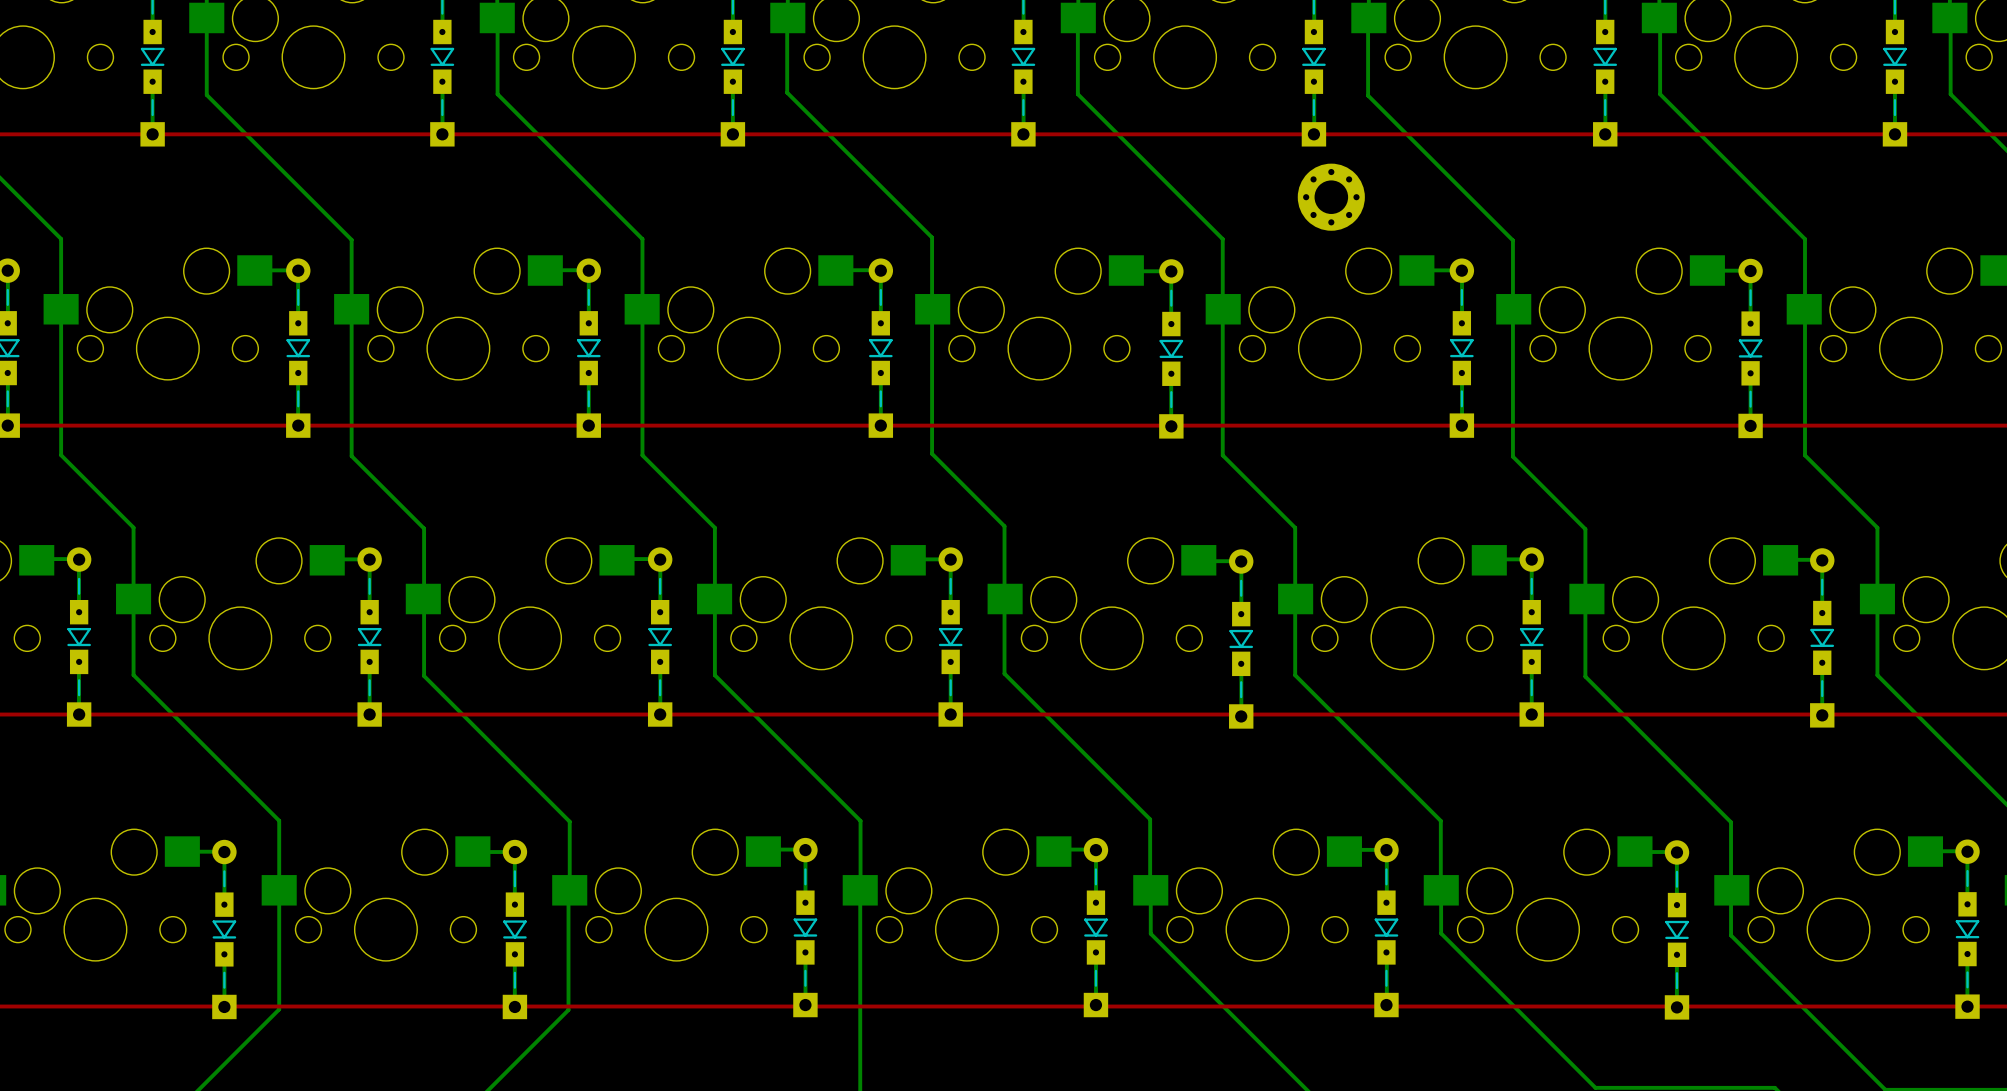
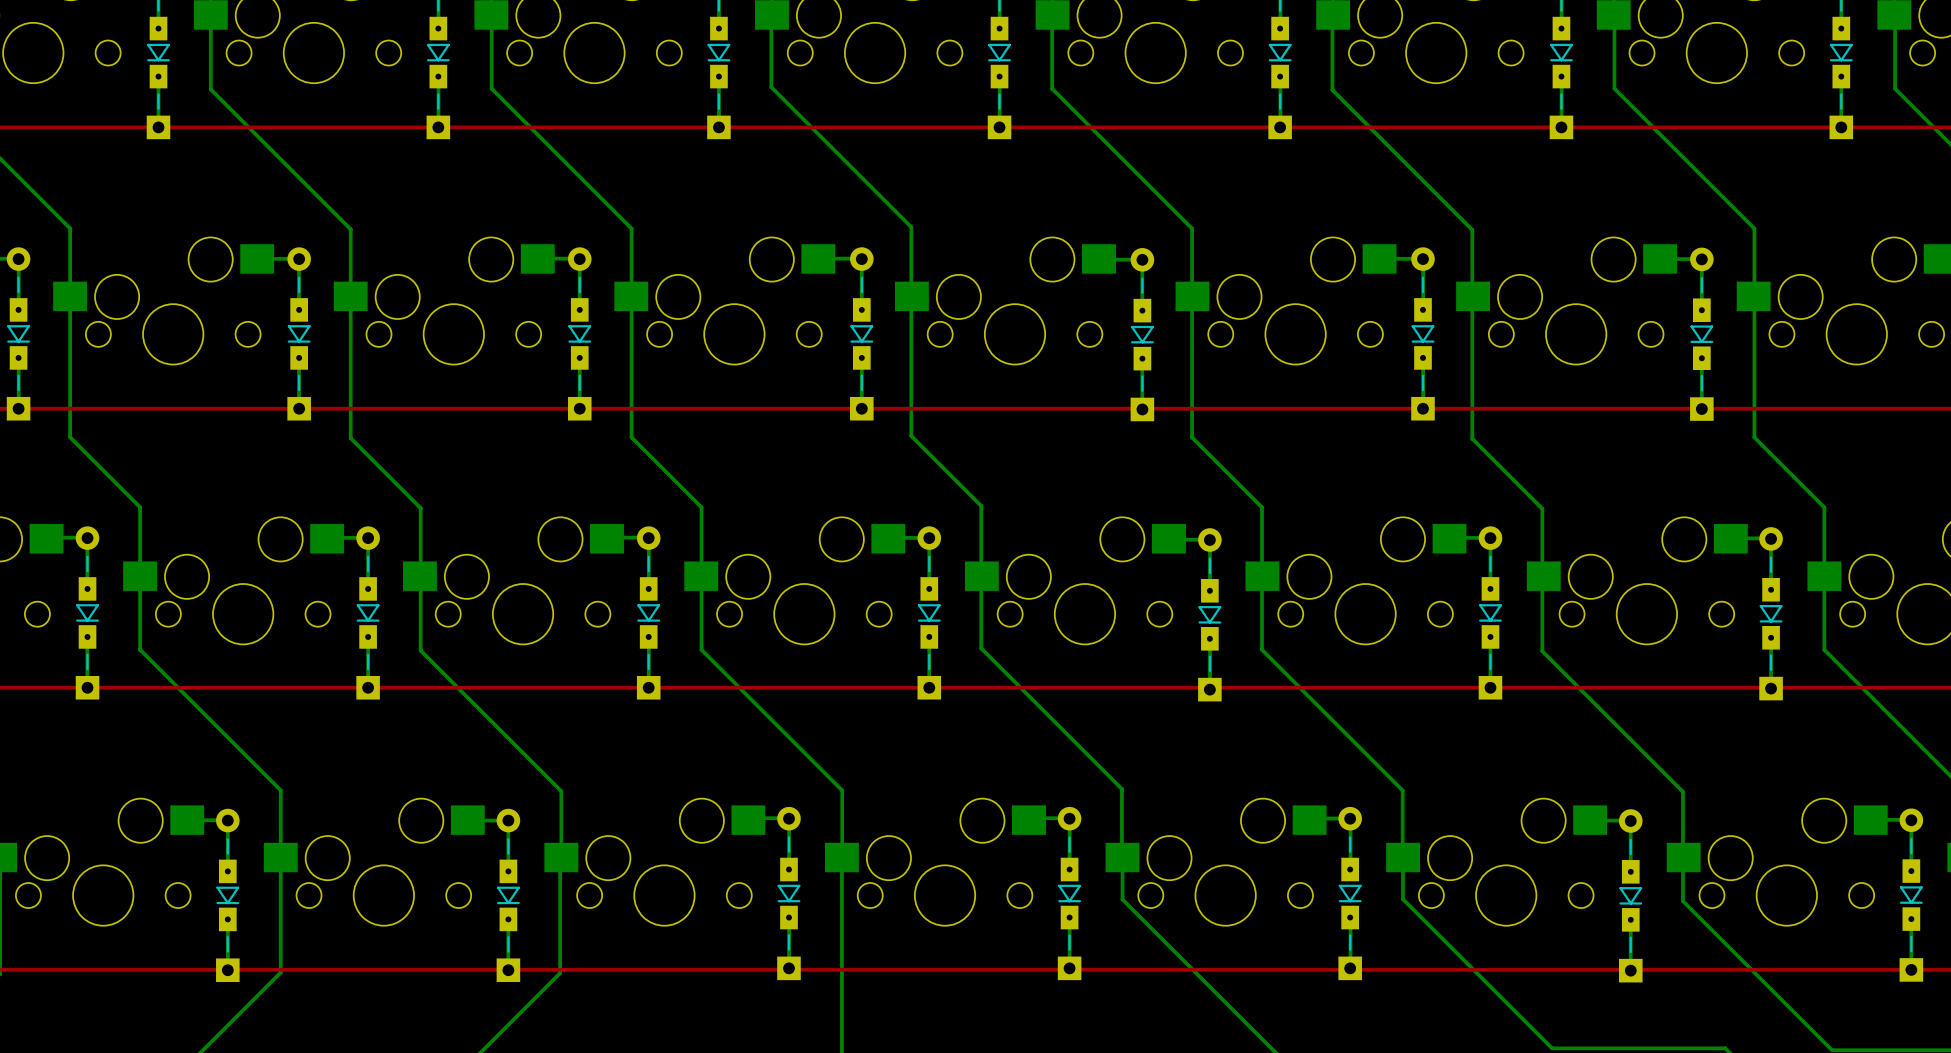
part: (1331, 197) -> none

